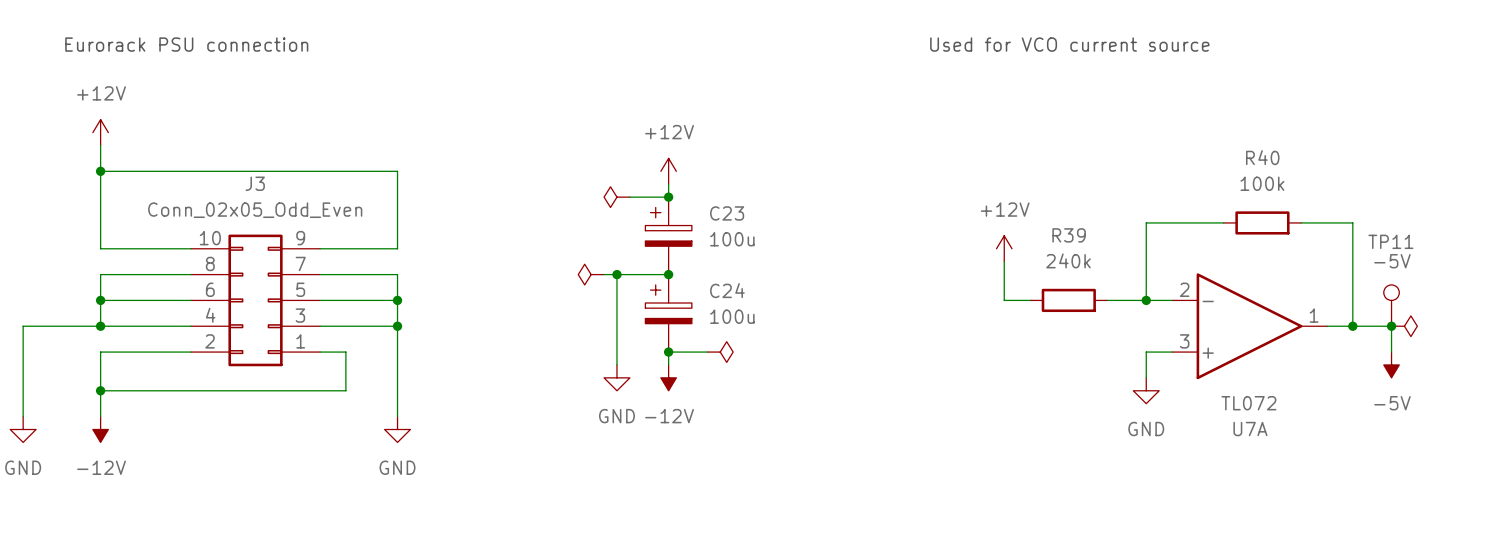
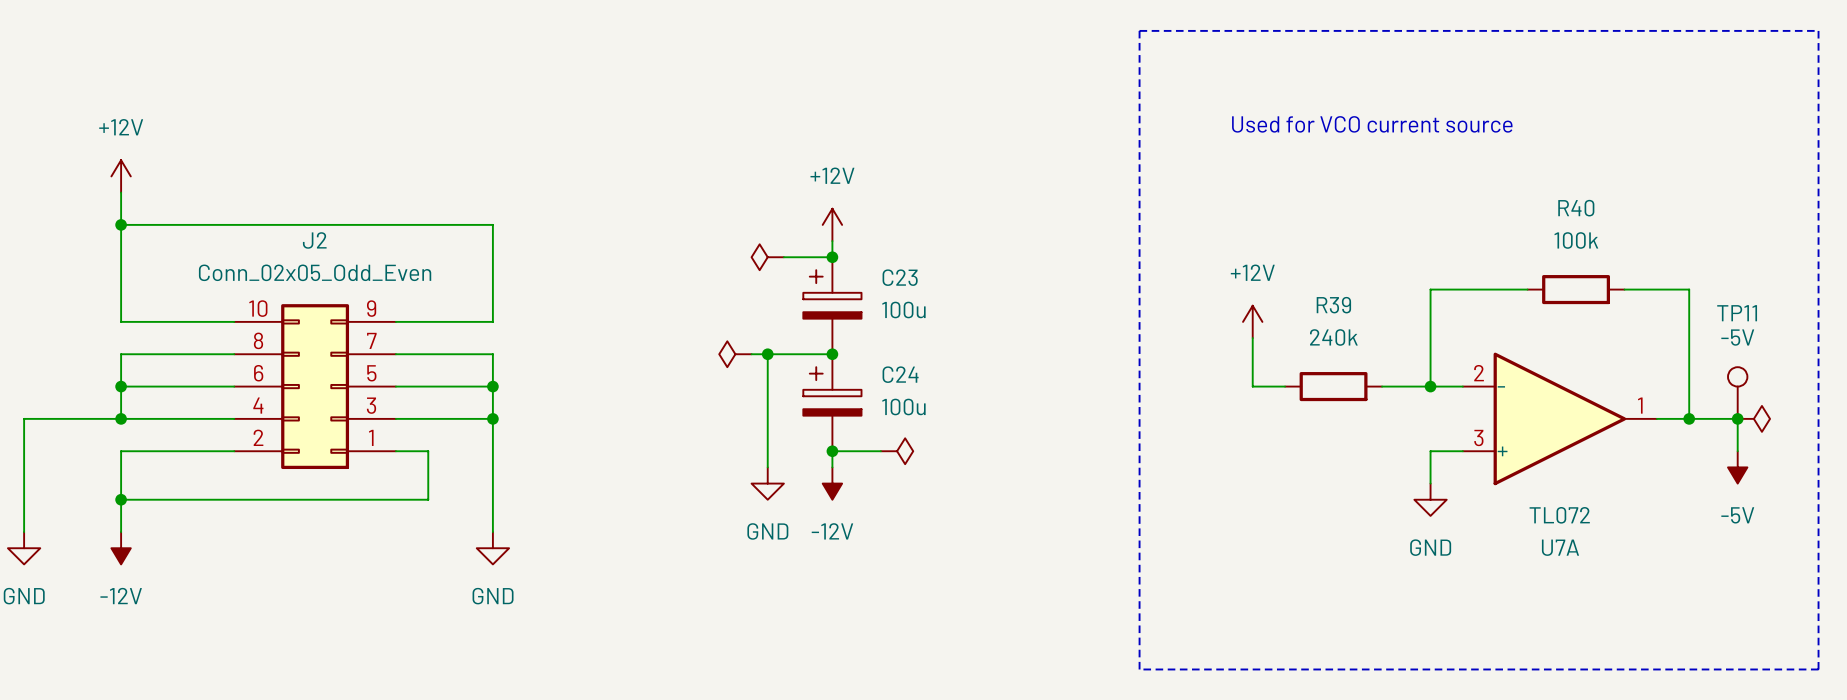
line: none -> (1139, 30) (1818, 30) (1818, 669) (1139, 669) (1139, 30)
text: Eurorack PSU connection (186, 44) -> none
text position: Used for VCO current source (1069, 44) -> Used for VCO current source (1372, 124)
J3 name: J3 (255, 183) -> J2 (314, 240)

